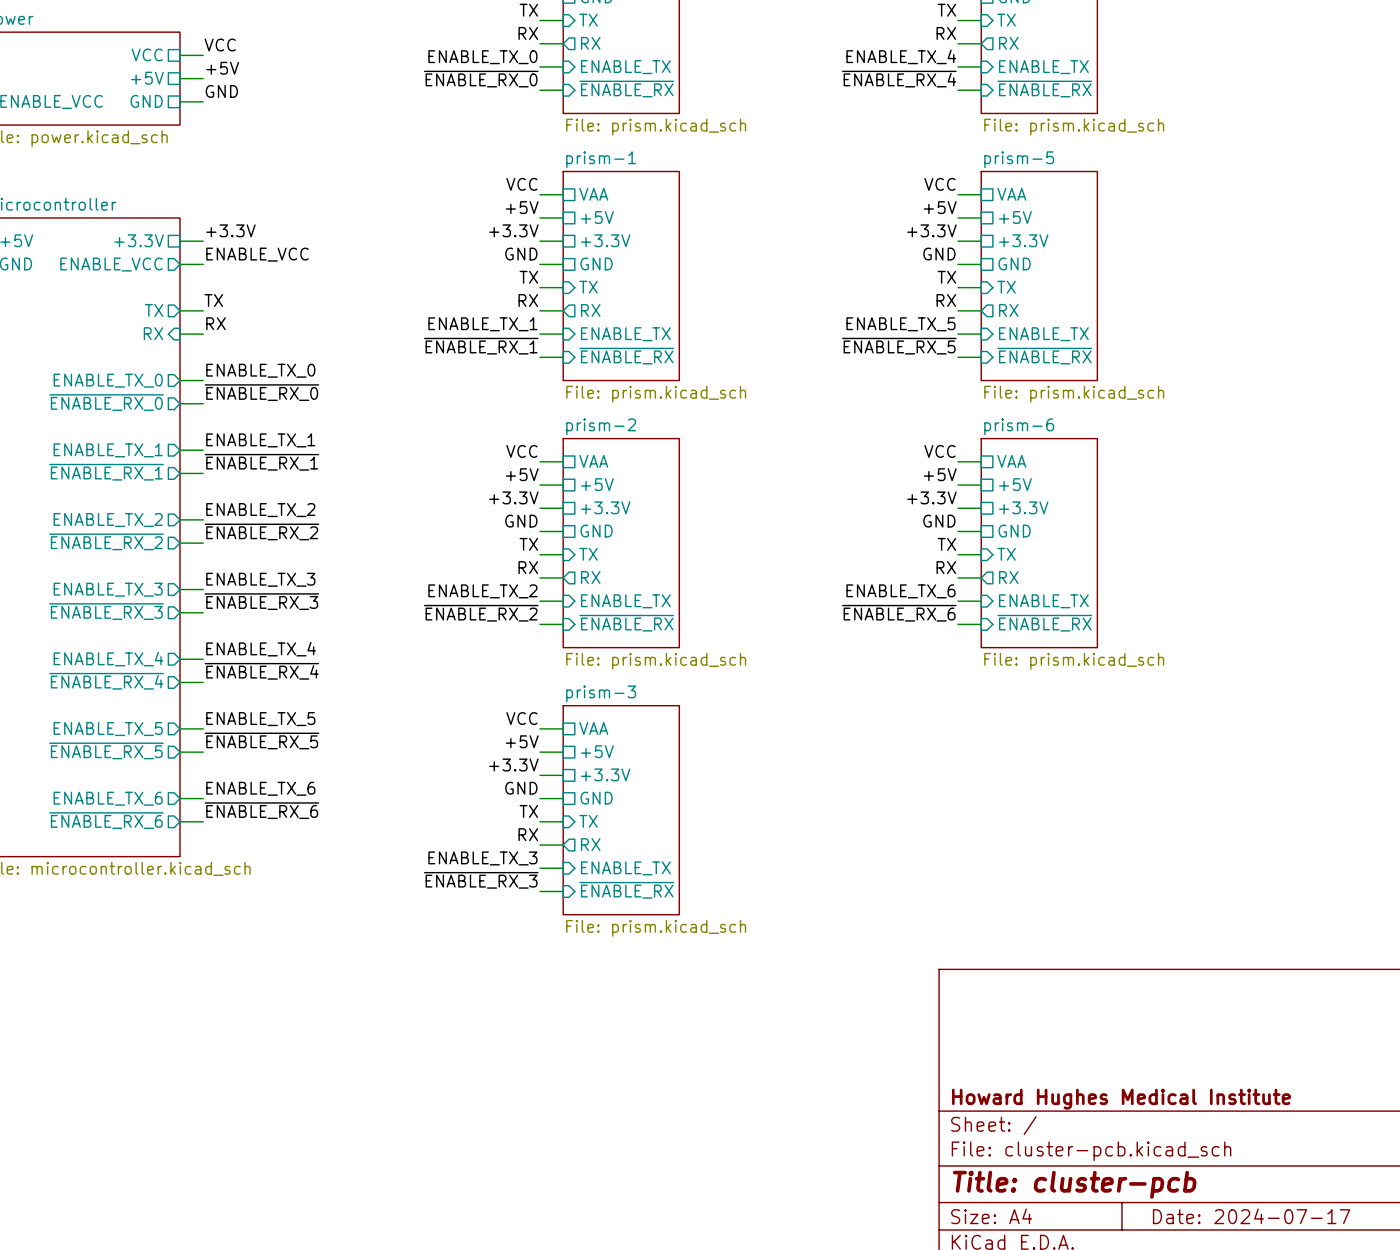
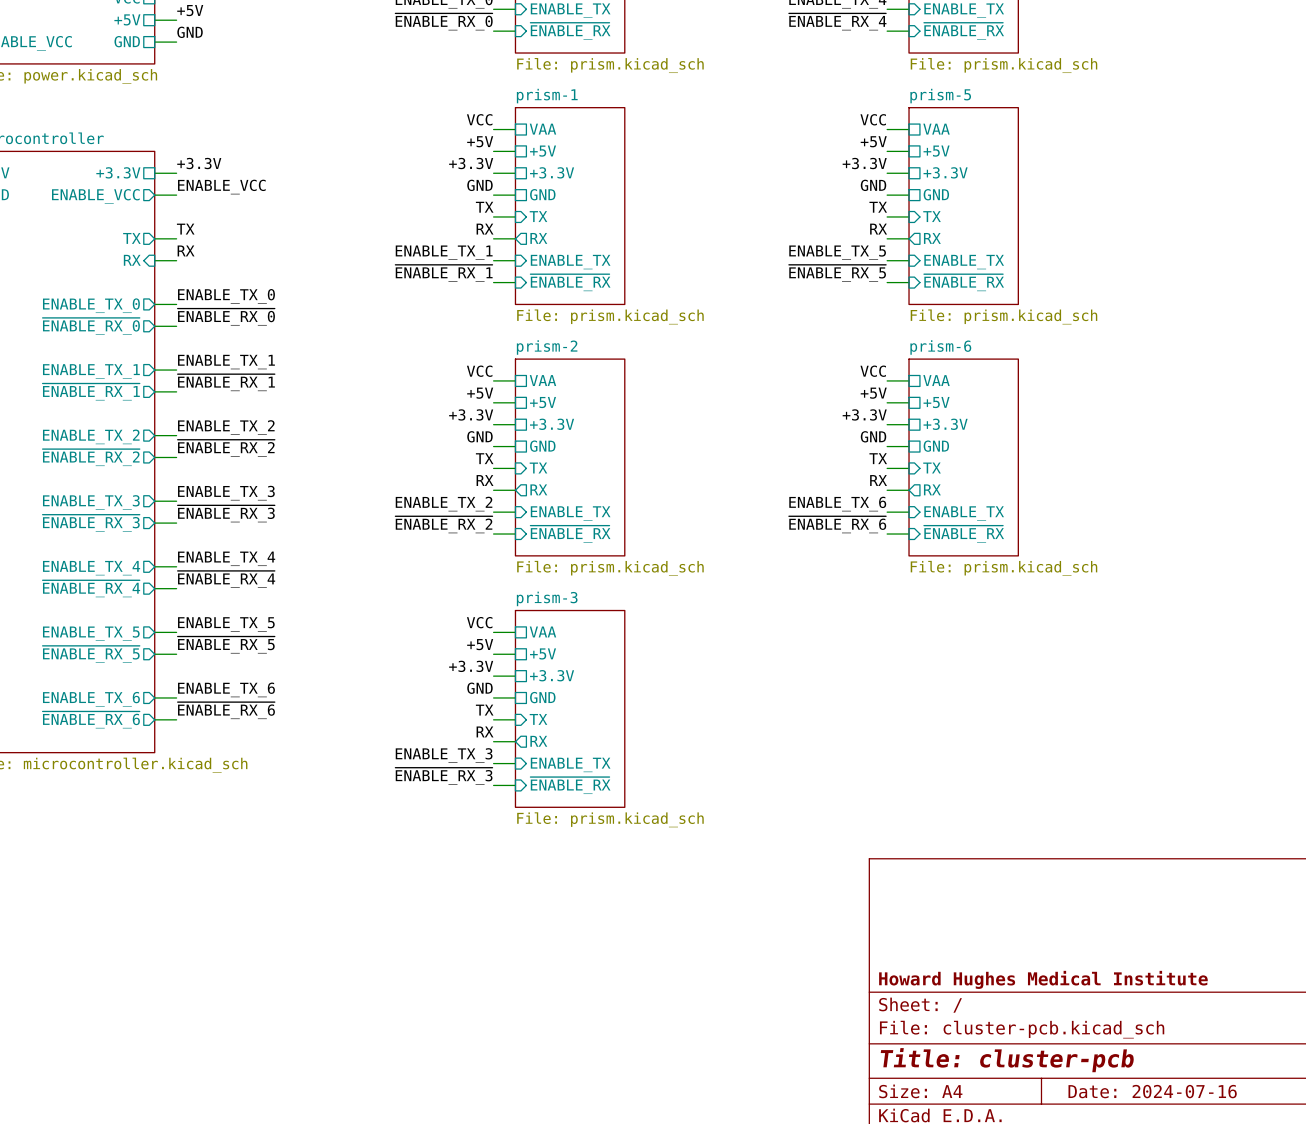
title block: Date: 2024-07-17 (1251, 1216) -> Date: 2024-07-16 (1152, 1091)

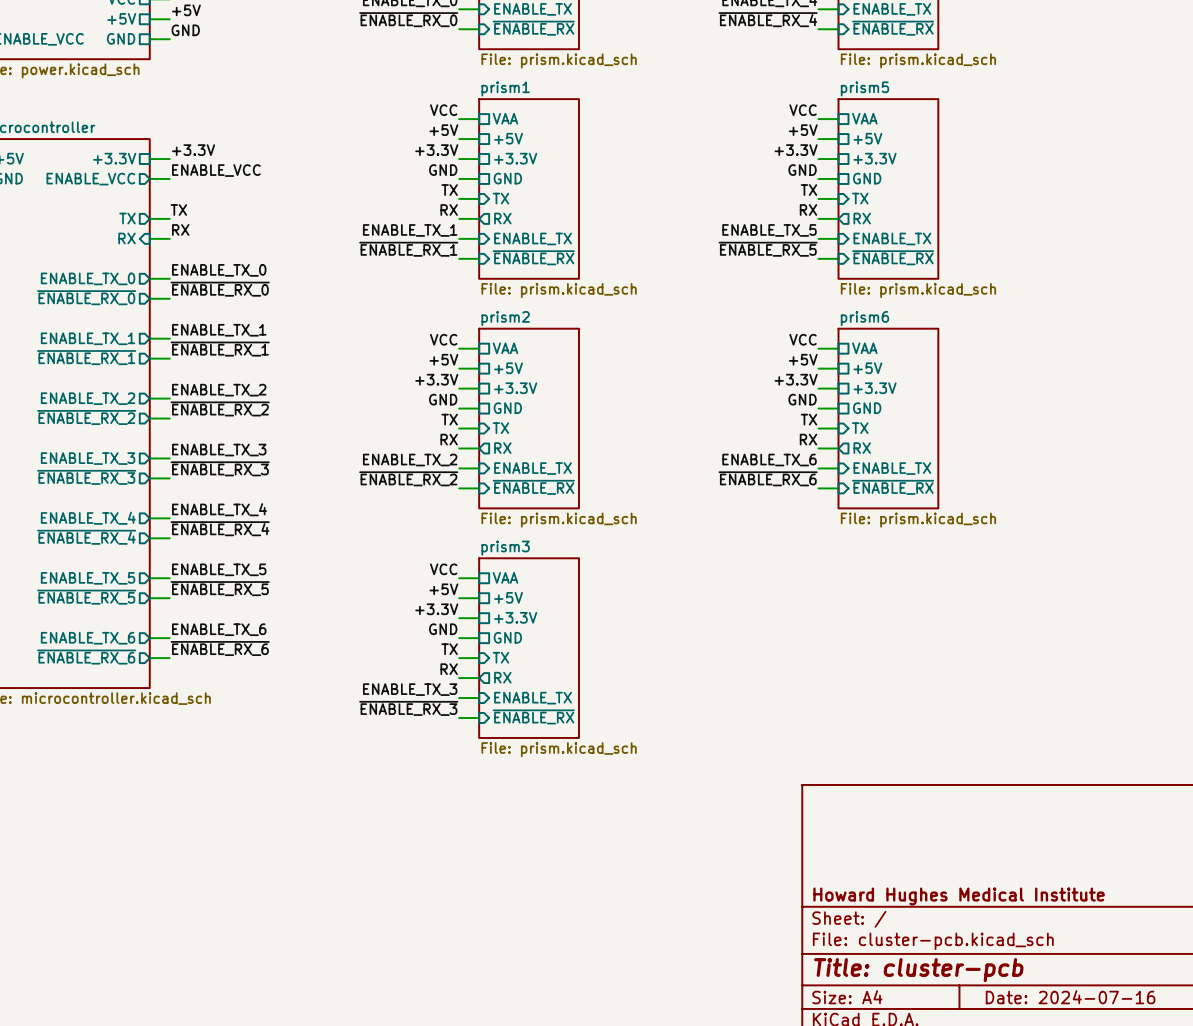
sheet prism-1 name: prism-1 (547, 96) -> prism1 (505, 88)
sheet prism-5 name: prism-5 (940, 96) -> prism5 (864, 88)
sheet prism-2 name: prism-2 (547, 347) -> prism2 (505, 318)
sheet prism-6 name: prism-6 (940, 347) -> prism6 (864, 318)
sheet prism-3 name: prism-3 (547, 598) -> prism3 (505, 548)

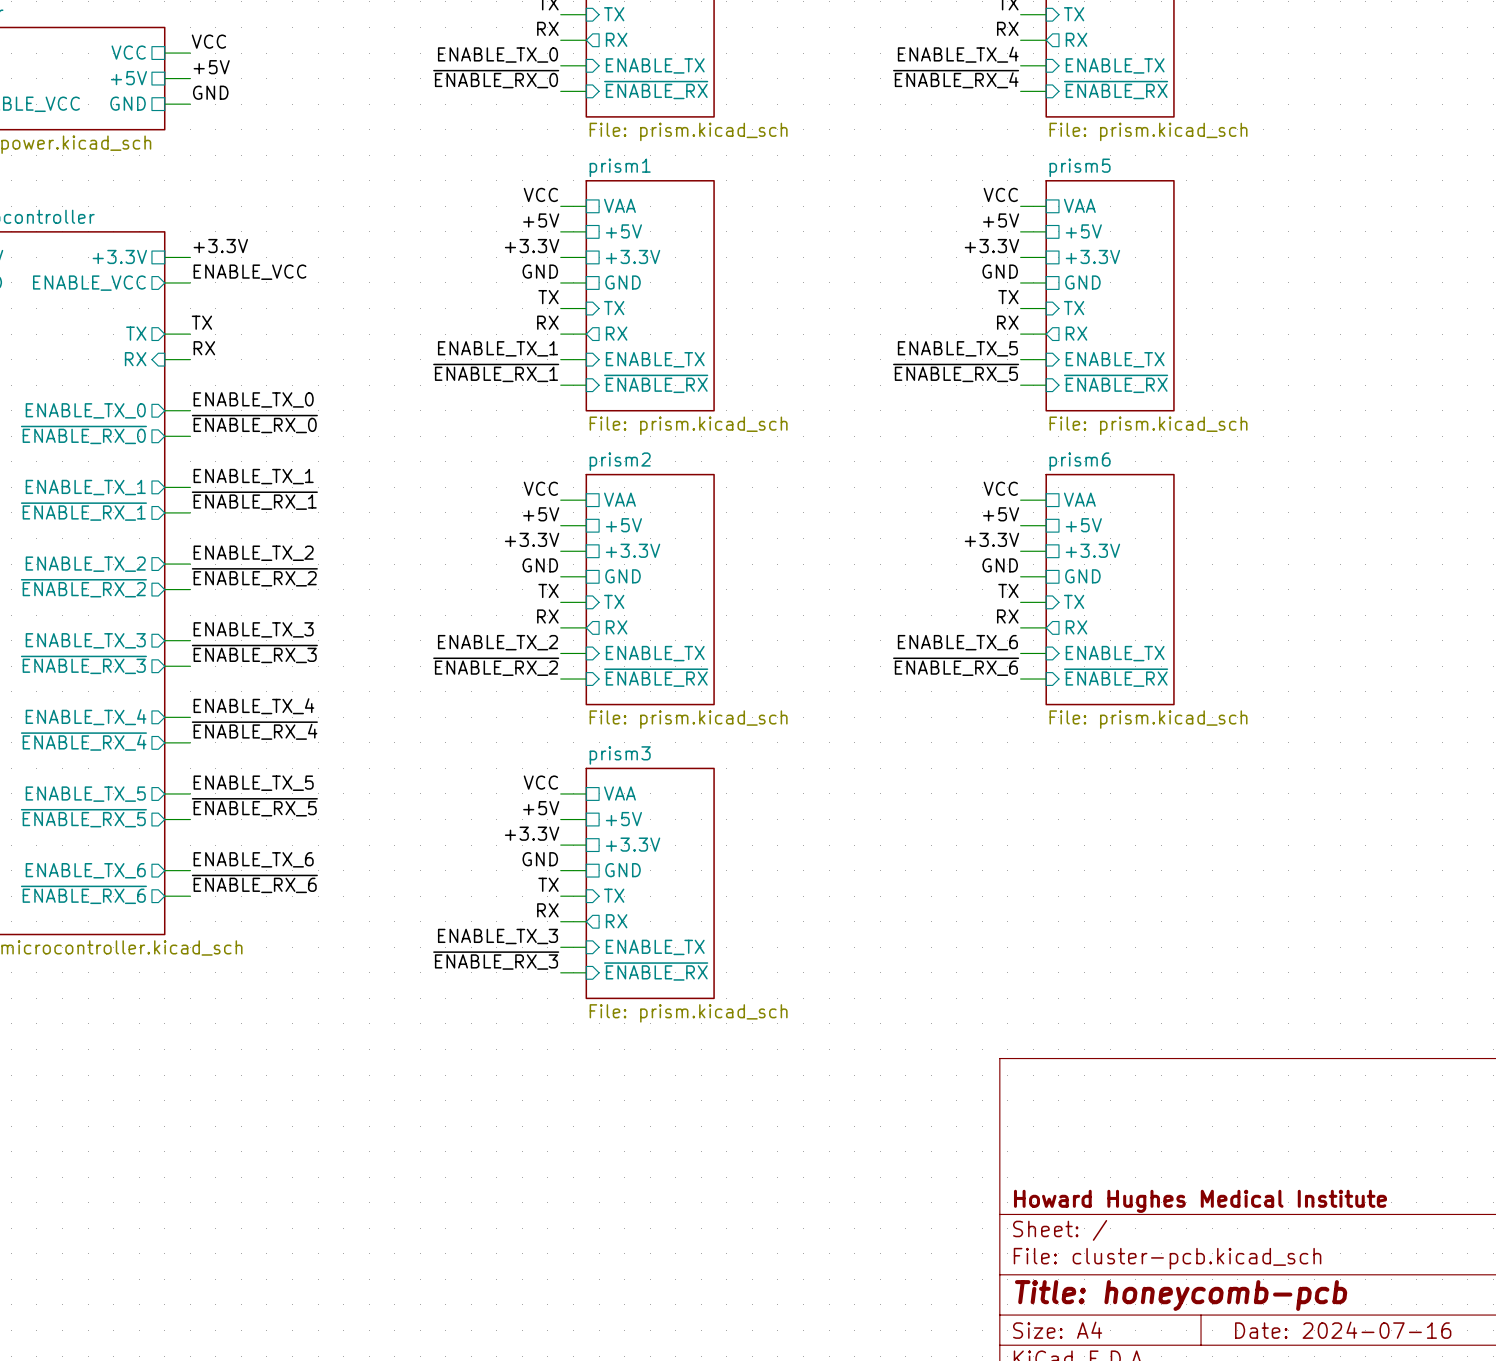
title block: Title: cluster-pcb (918, 970) -> Title: honeycomb-pcb (1181, 1295)

